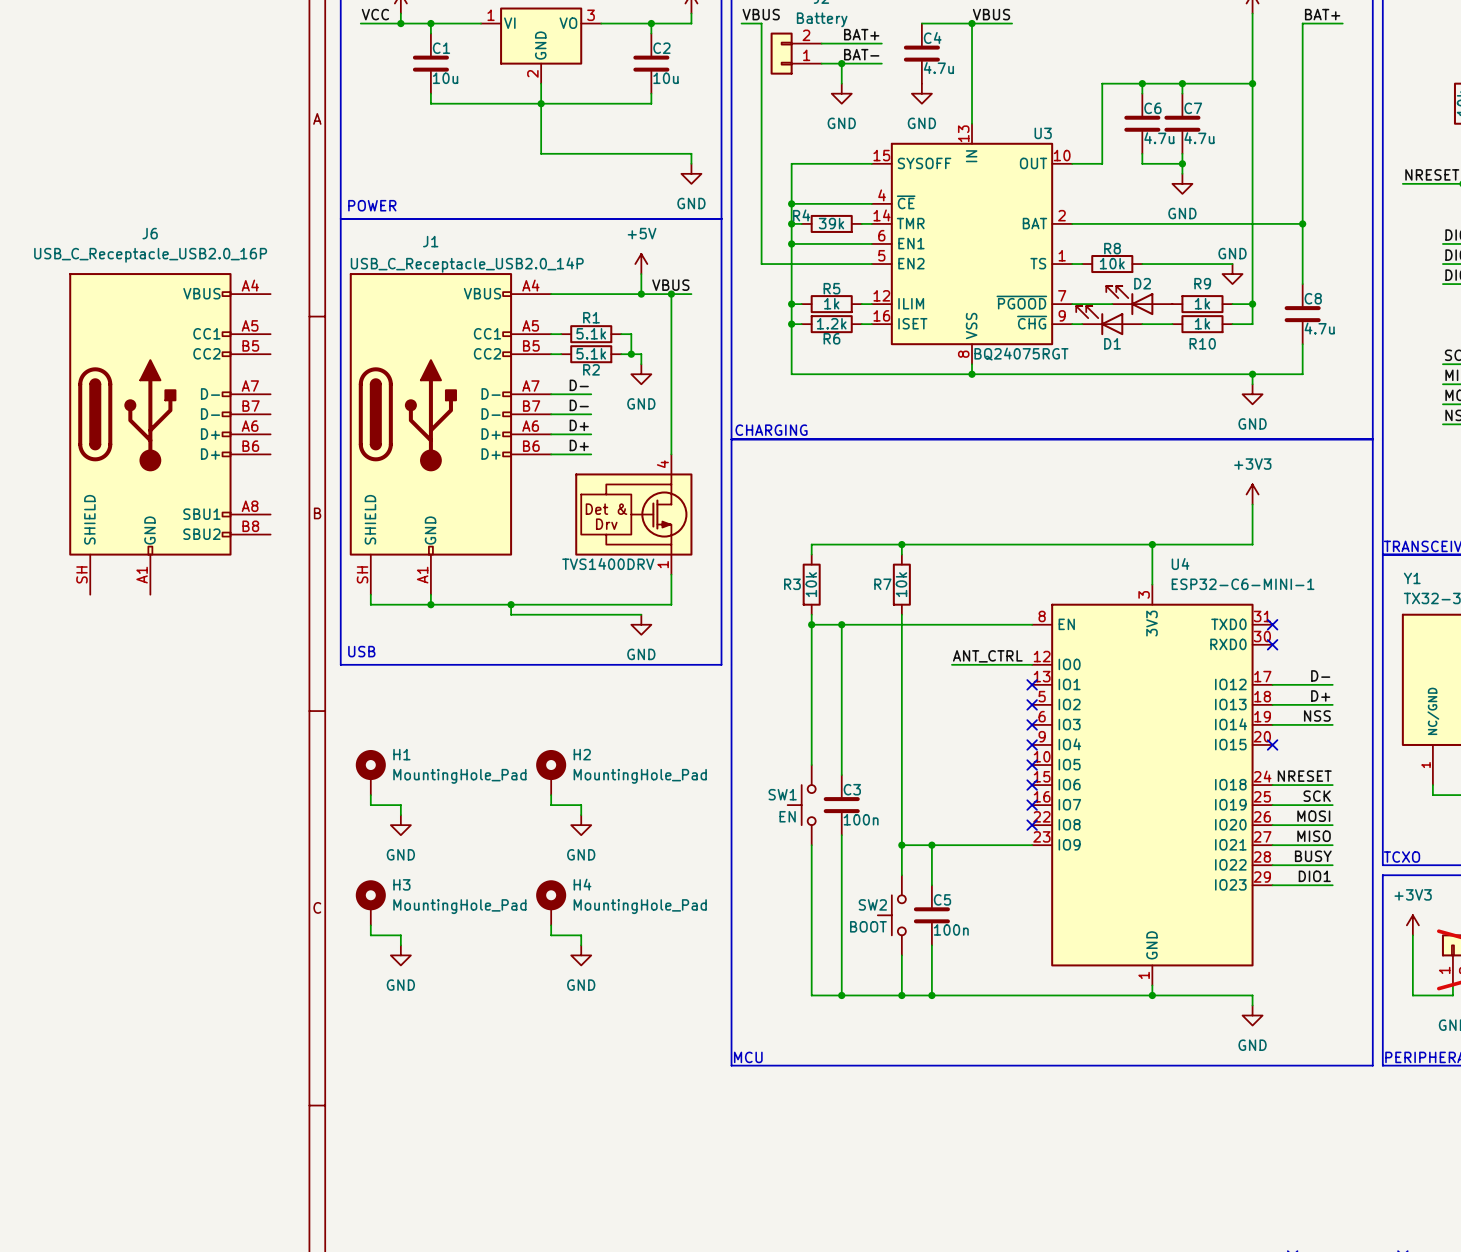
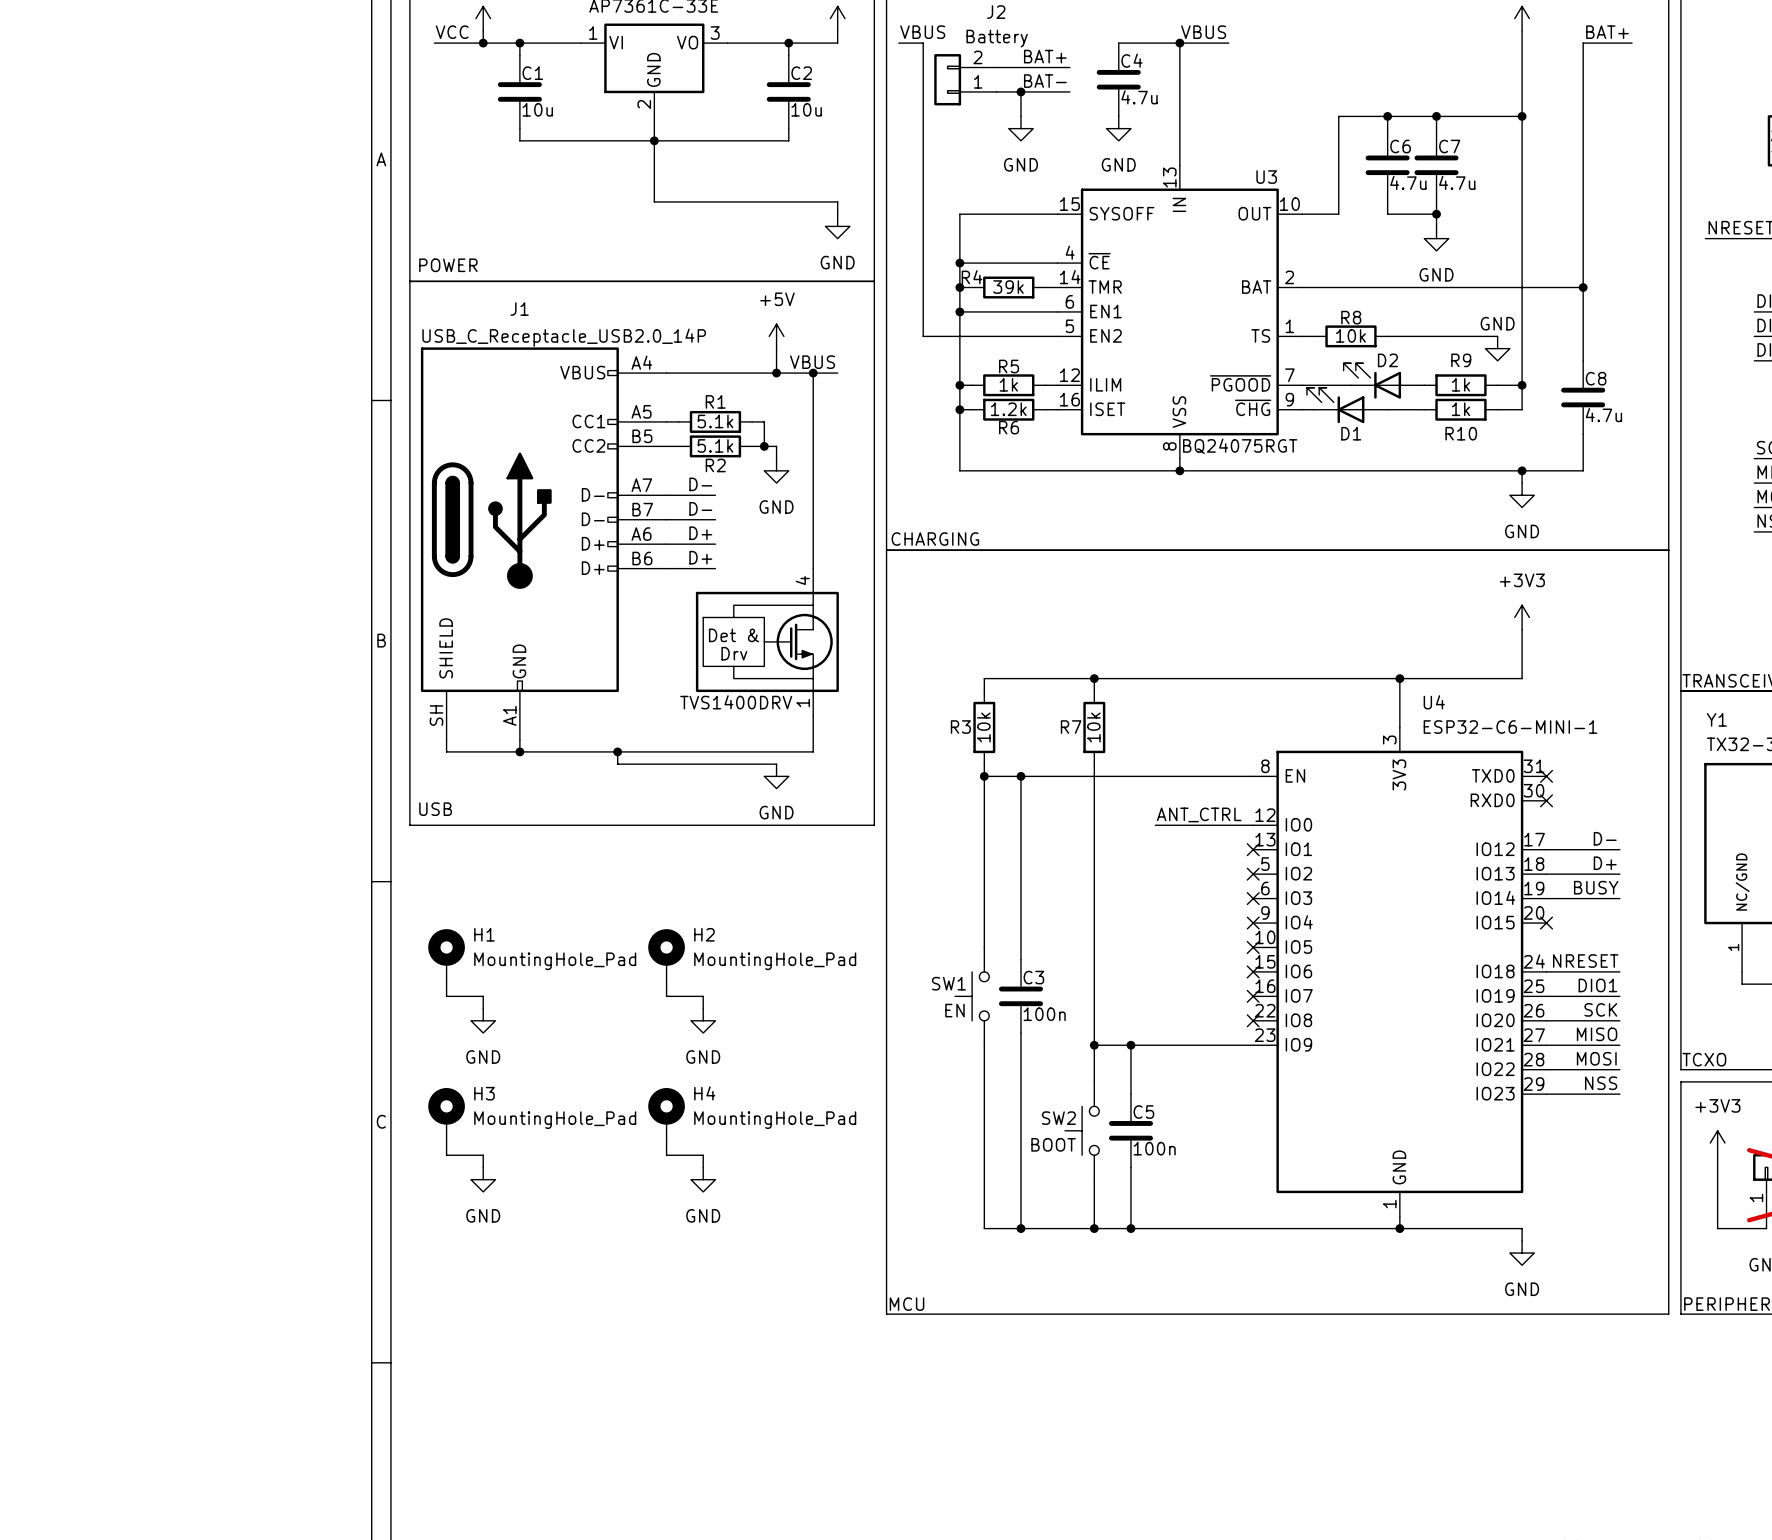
J6: USB_C_Receptacle_USB2.0_16P (169, 433) -> none
label: NSS (1317, 716) -> BUSY (1596, 887)
label: SCK (1317, 796) -> DIO1 (1597, 985)
label: MOSI (1313, 816) -> SCK (1600, 1009)
label: BUSY (1313, 856) -> MOSI (1596, 1058)
label: DIO1 (1314, 876) -> NSS (1601, 1083)

